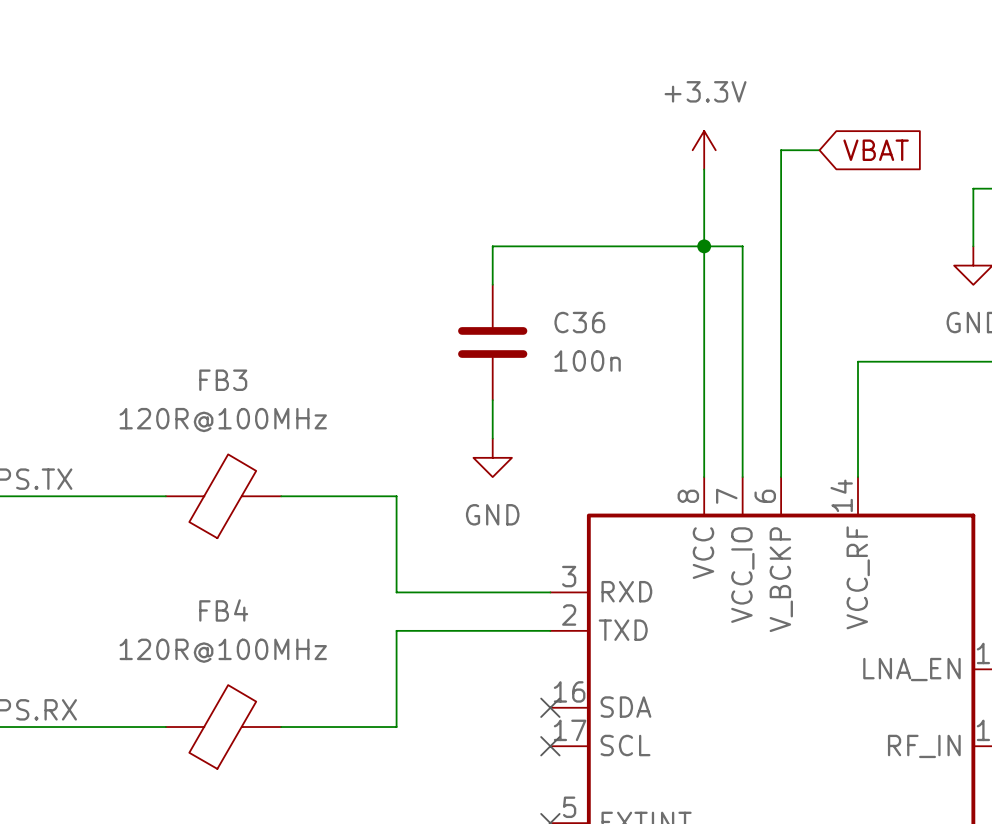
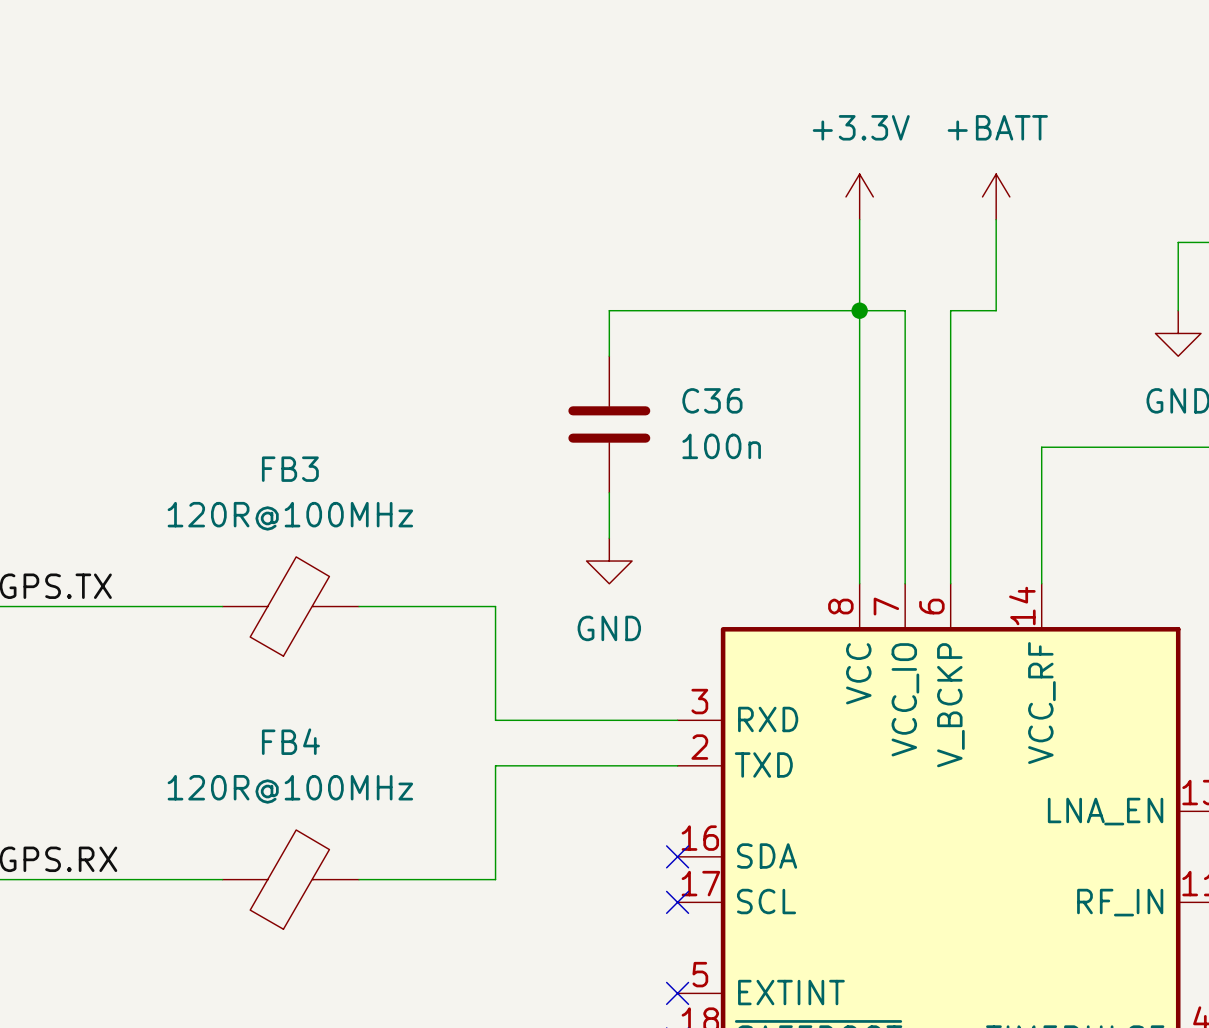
wire: (819, 150) (781, 150) (781, 246) -> (996, 219) (996, 310) (950, 310)
power symbol: none -> +BATT (996, 196)
global label: VBAT (876, 150) -> none

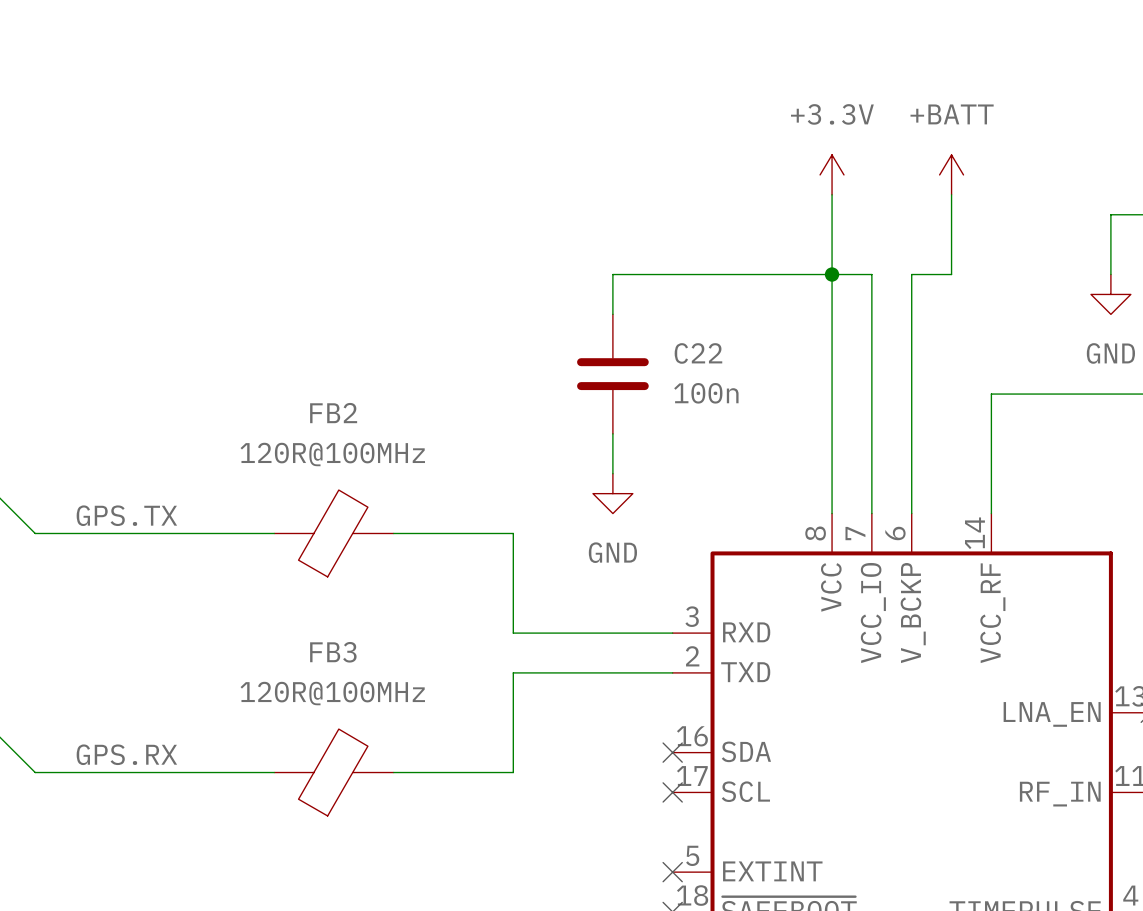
C36 name: C36 (712, 400) -> C22 (698, 353)
FB3 name: FB3 (290, 469) -> FB2 (333, 413)
FB4 name: FB4 (290, 741) -> FB3 (333, 652)

